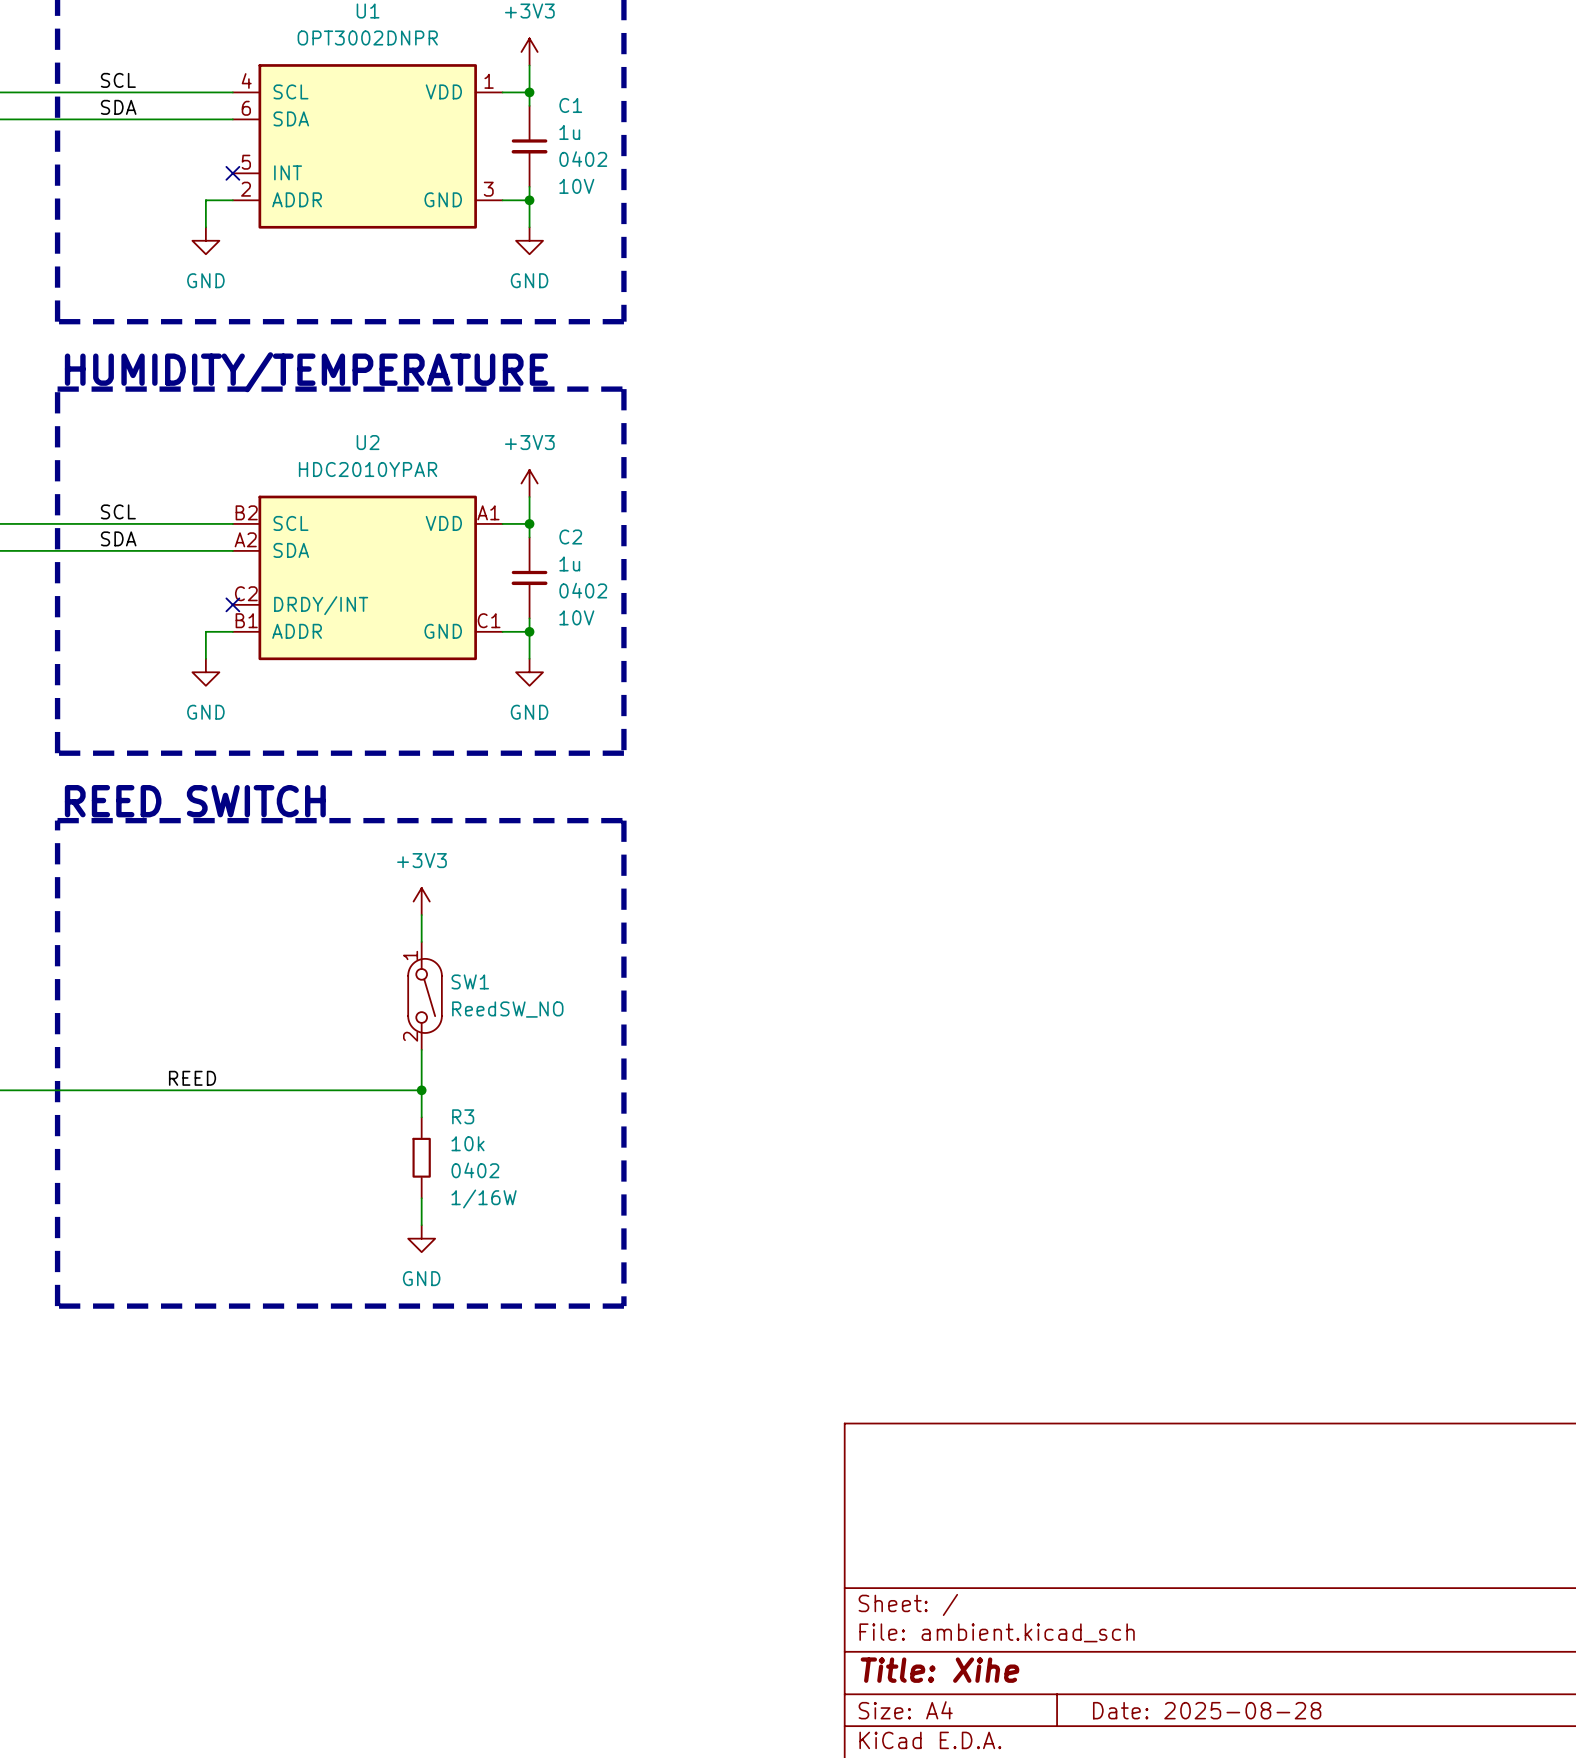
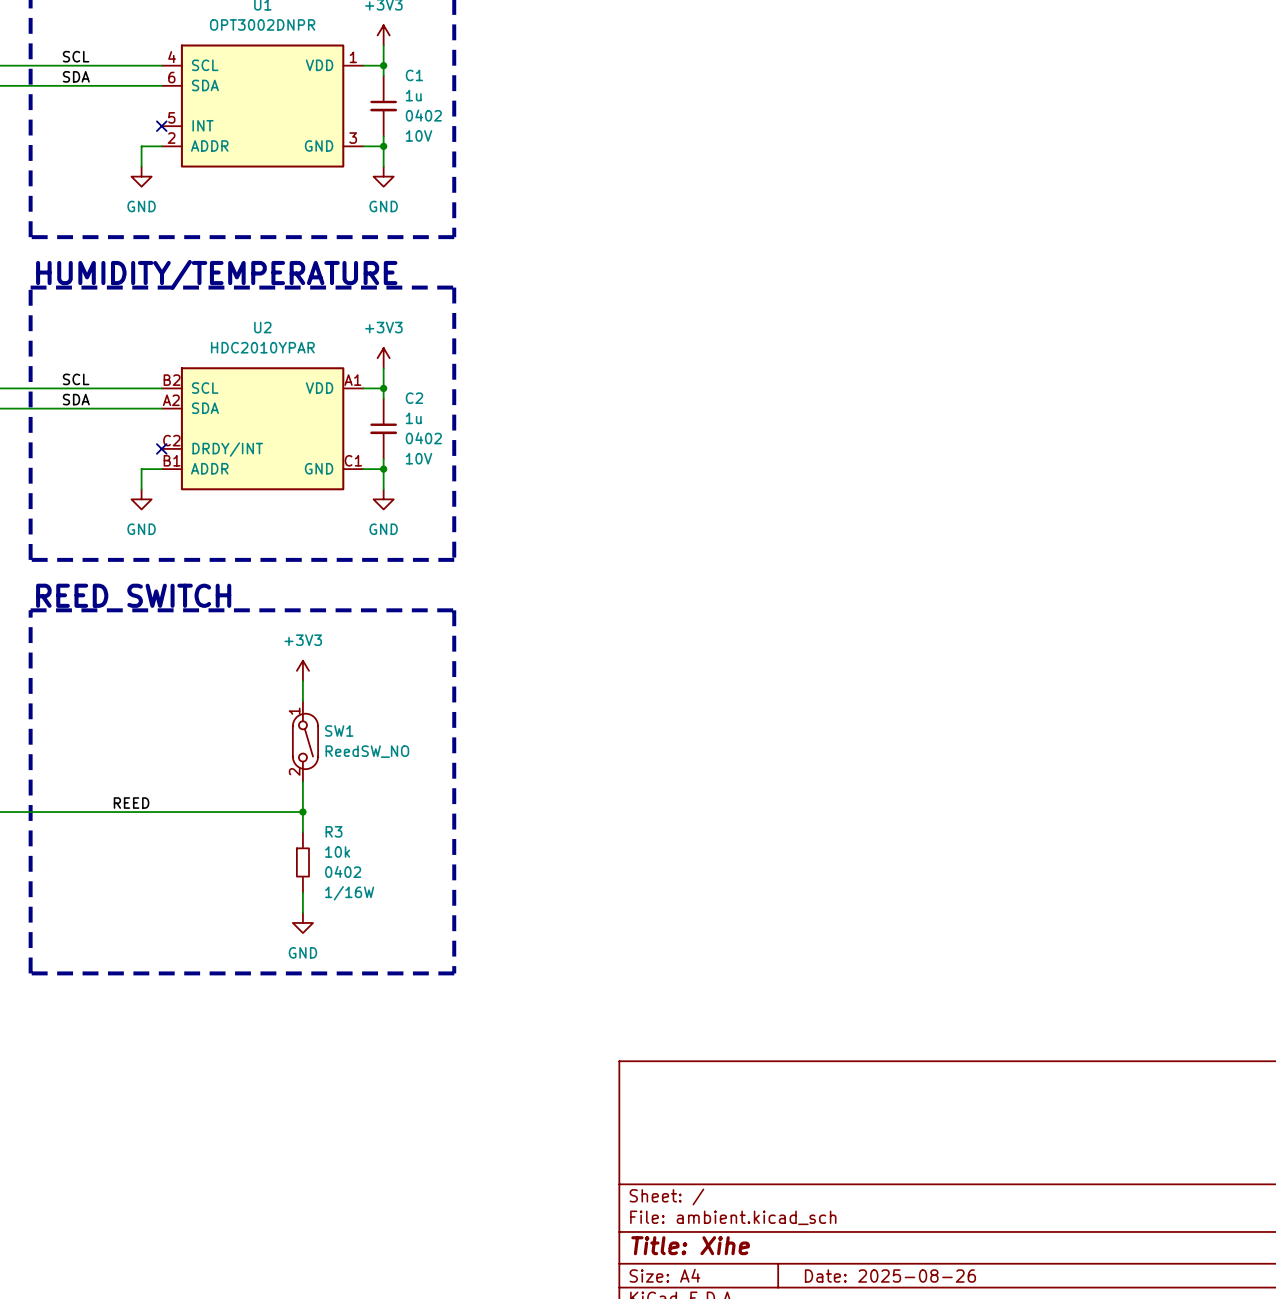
title block: Date: 2025-08-28 (1207, 1710) -> Date: 2025-08-26 (890, 1276)

